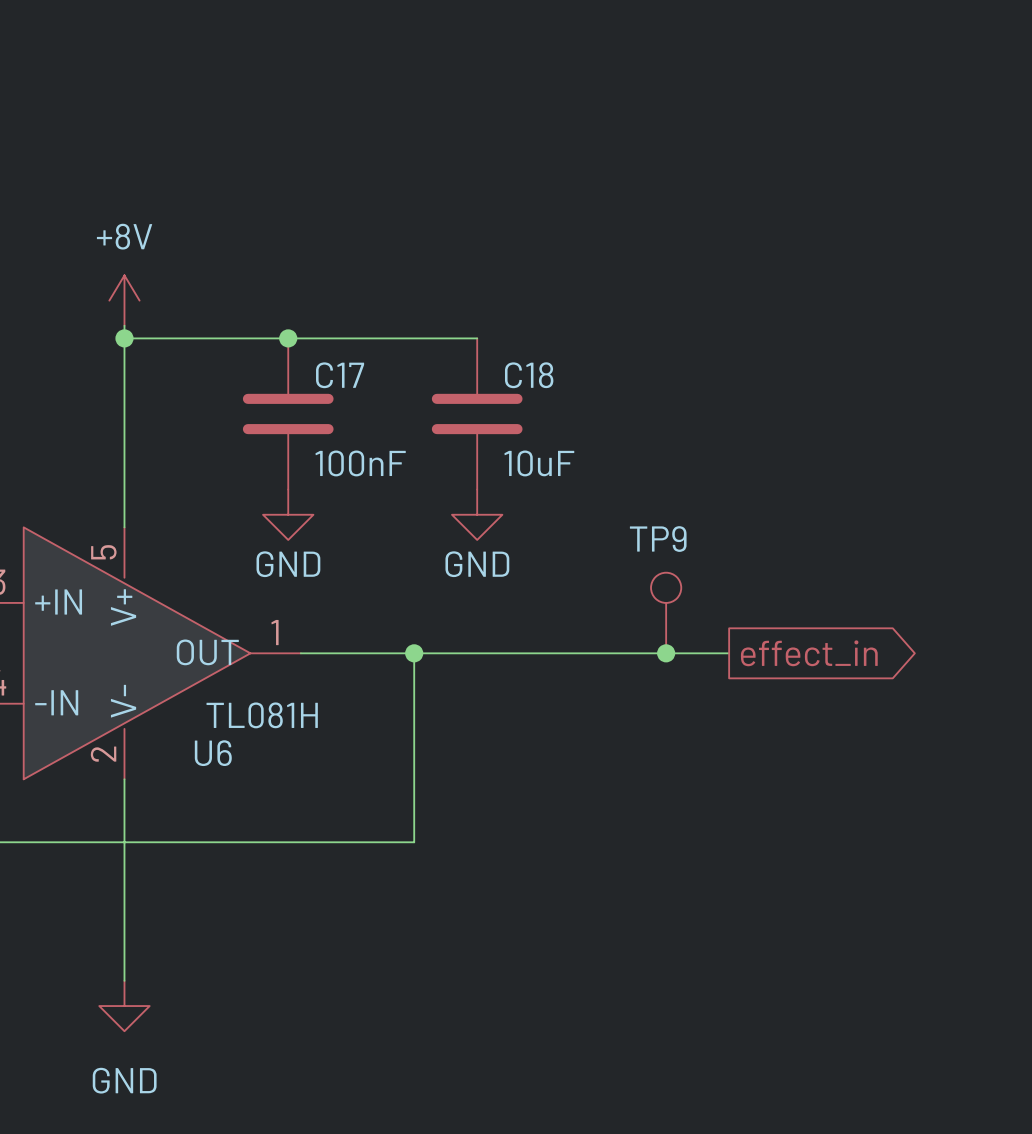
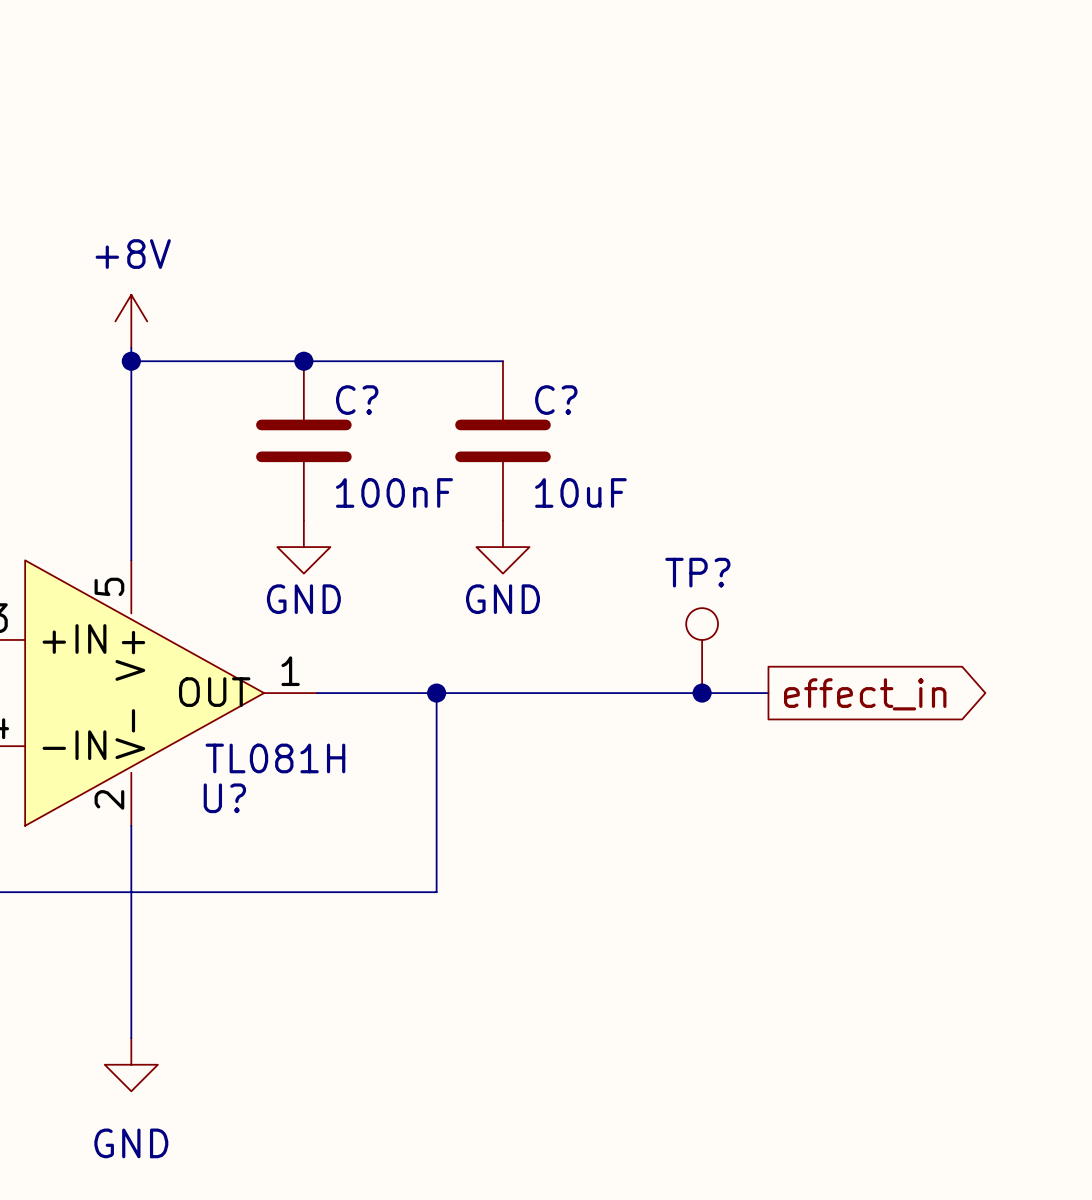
C17 name: C17 (340, 375) -> C? (357, 400)
C18 name: C18 (529, 375) -> C? (556, 400)
TP9 name: TP9 (658, 539) -> TP? (697, 572)
U6 name: U6 (213, 753) -> U? (224, 798)

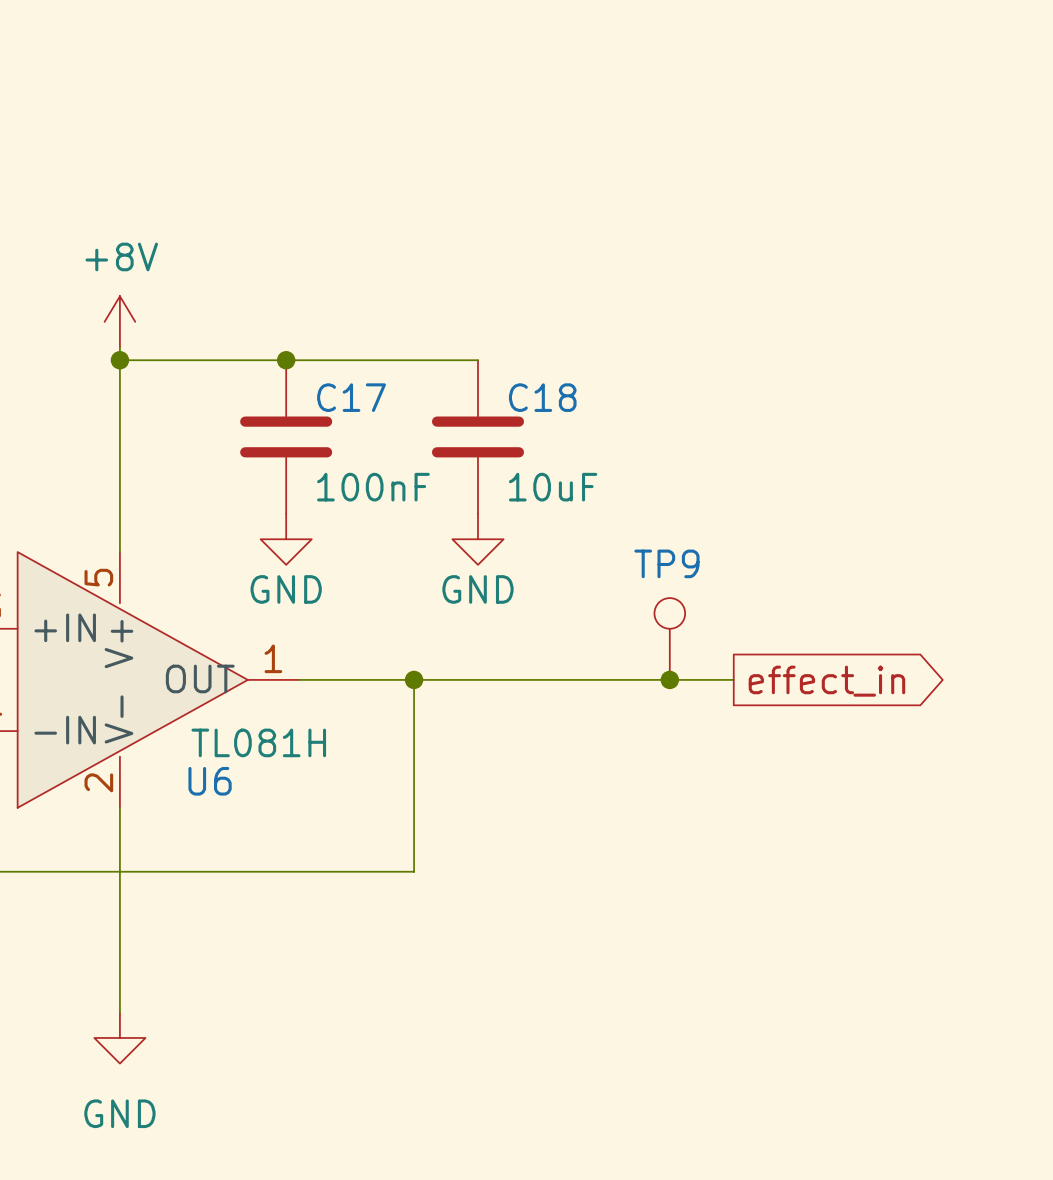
C? name: C? (357, 400) -> C17 (351, 397)
C? name: C? (556, 400) -> C18 (542, 397)
TP? name: TP? (697, 572) -> TP9 (666, 563)
U? name: U? (224, 798) -> U6 (210, 781)

